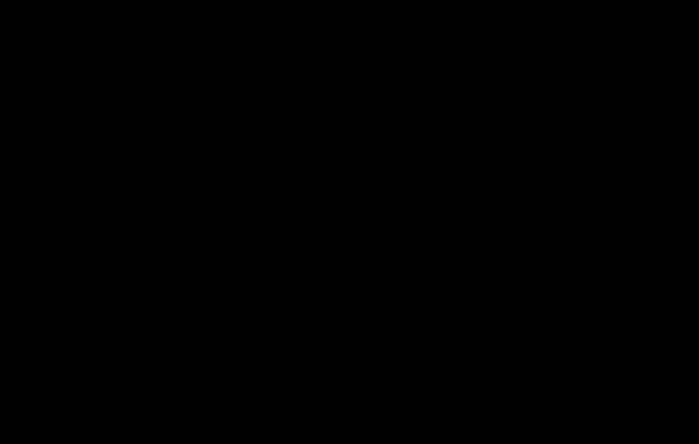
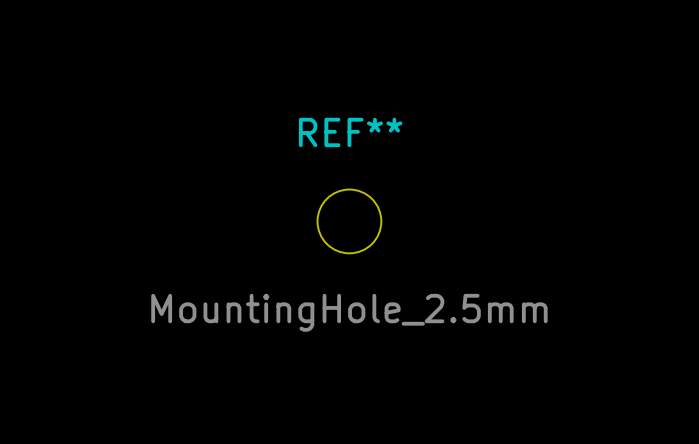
REF**: none -> MountingHole_2.5mm (349, 221)

